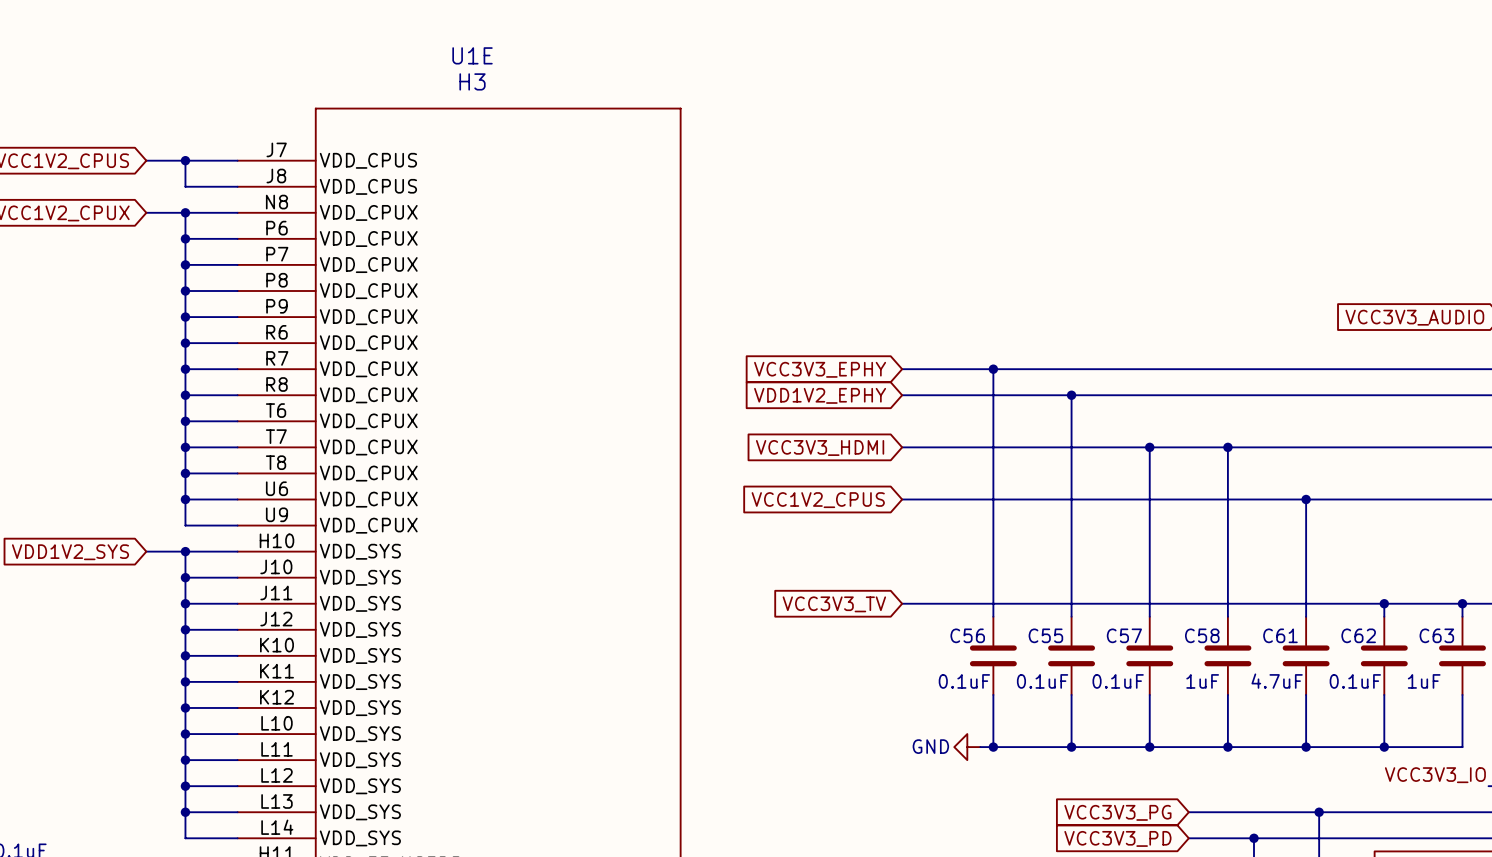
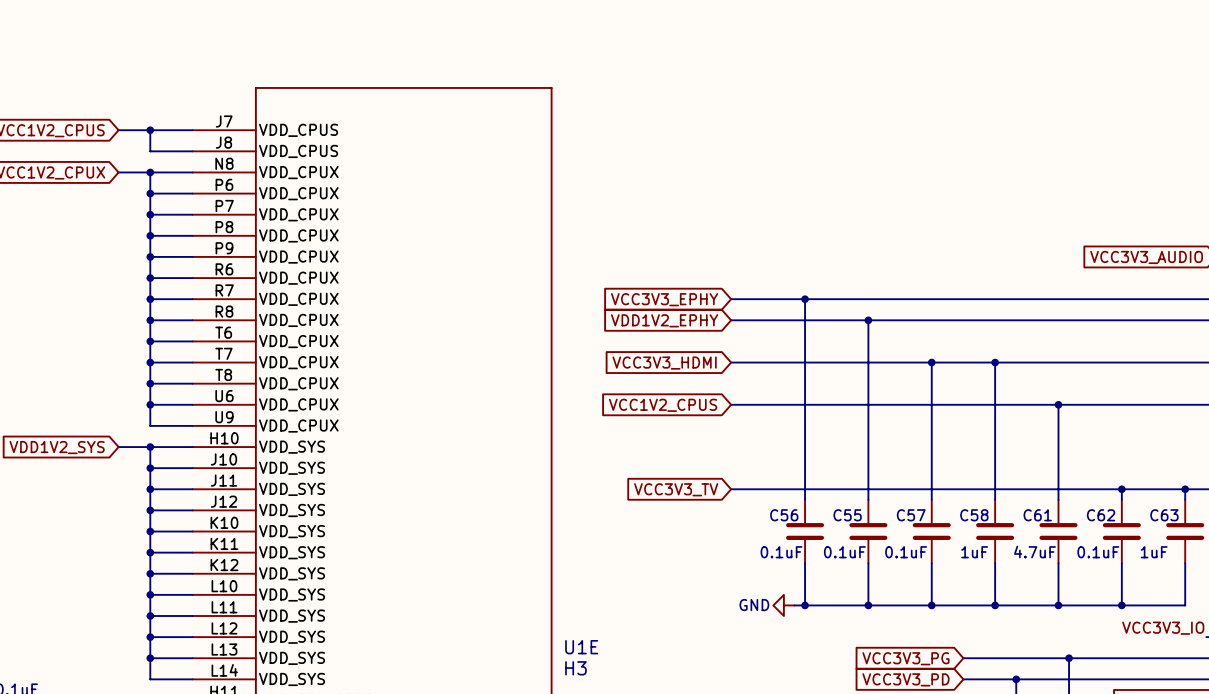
U1E name position: U1E (472, 55) -> U1E (581, 647)
U1E value position: H3 (472, 81) -> H3 (575, 668)

